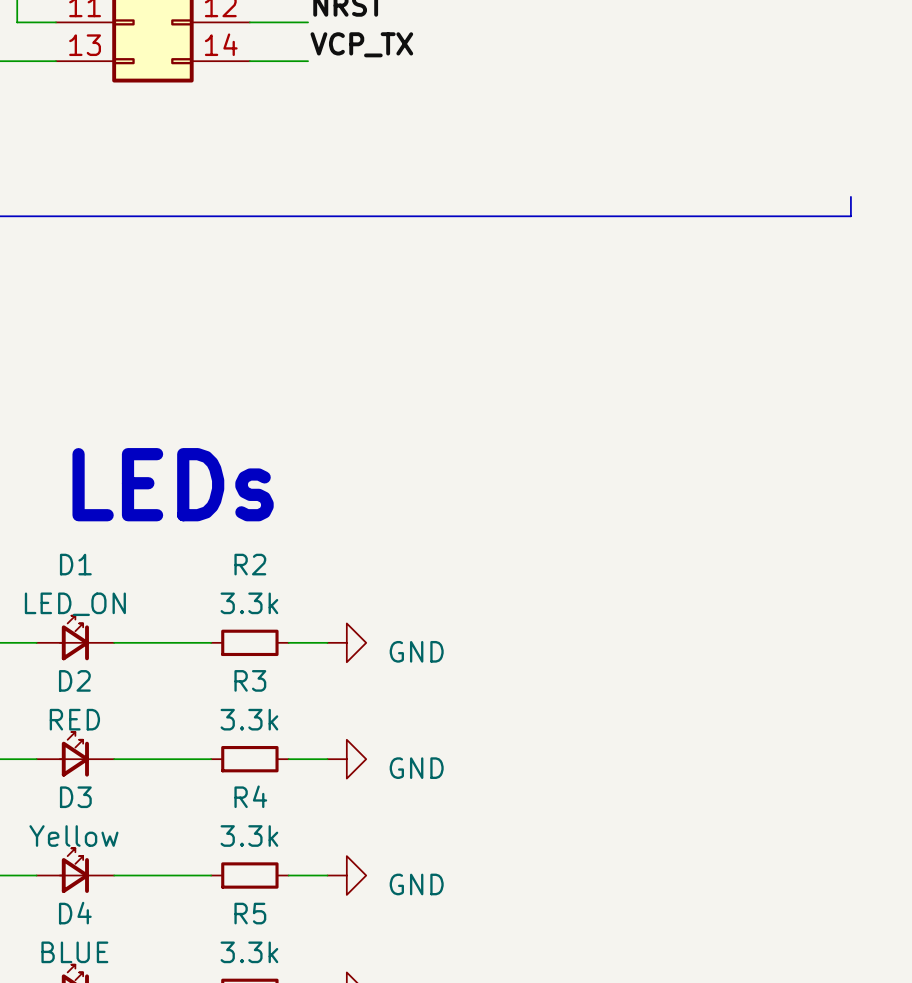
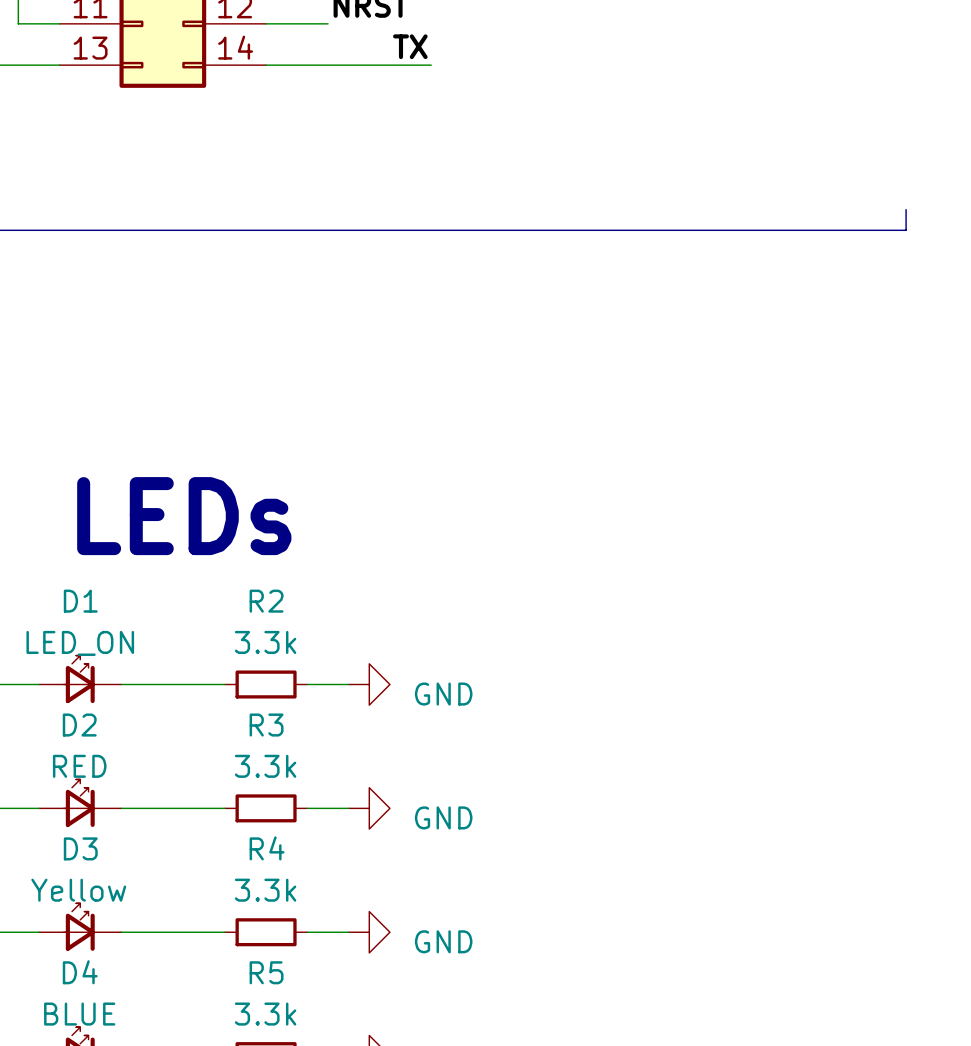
label: none -> TX (410, 46)
label: VCP_TX (361, 44) -> none
wire: none -> (328, 65) (431, 65)

